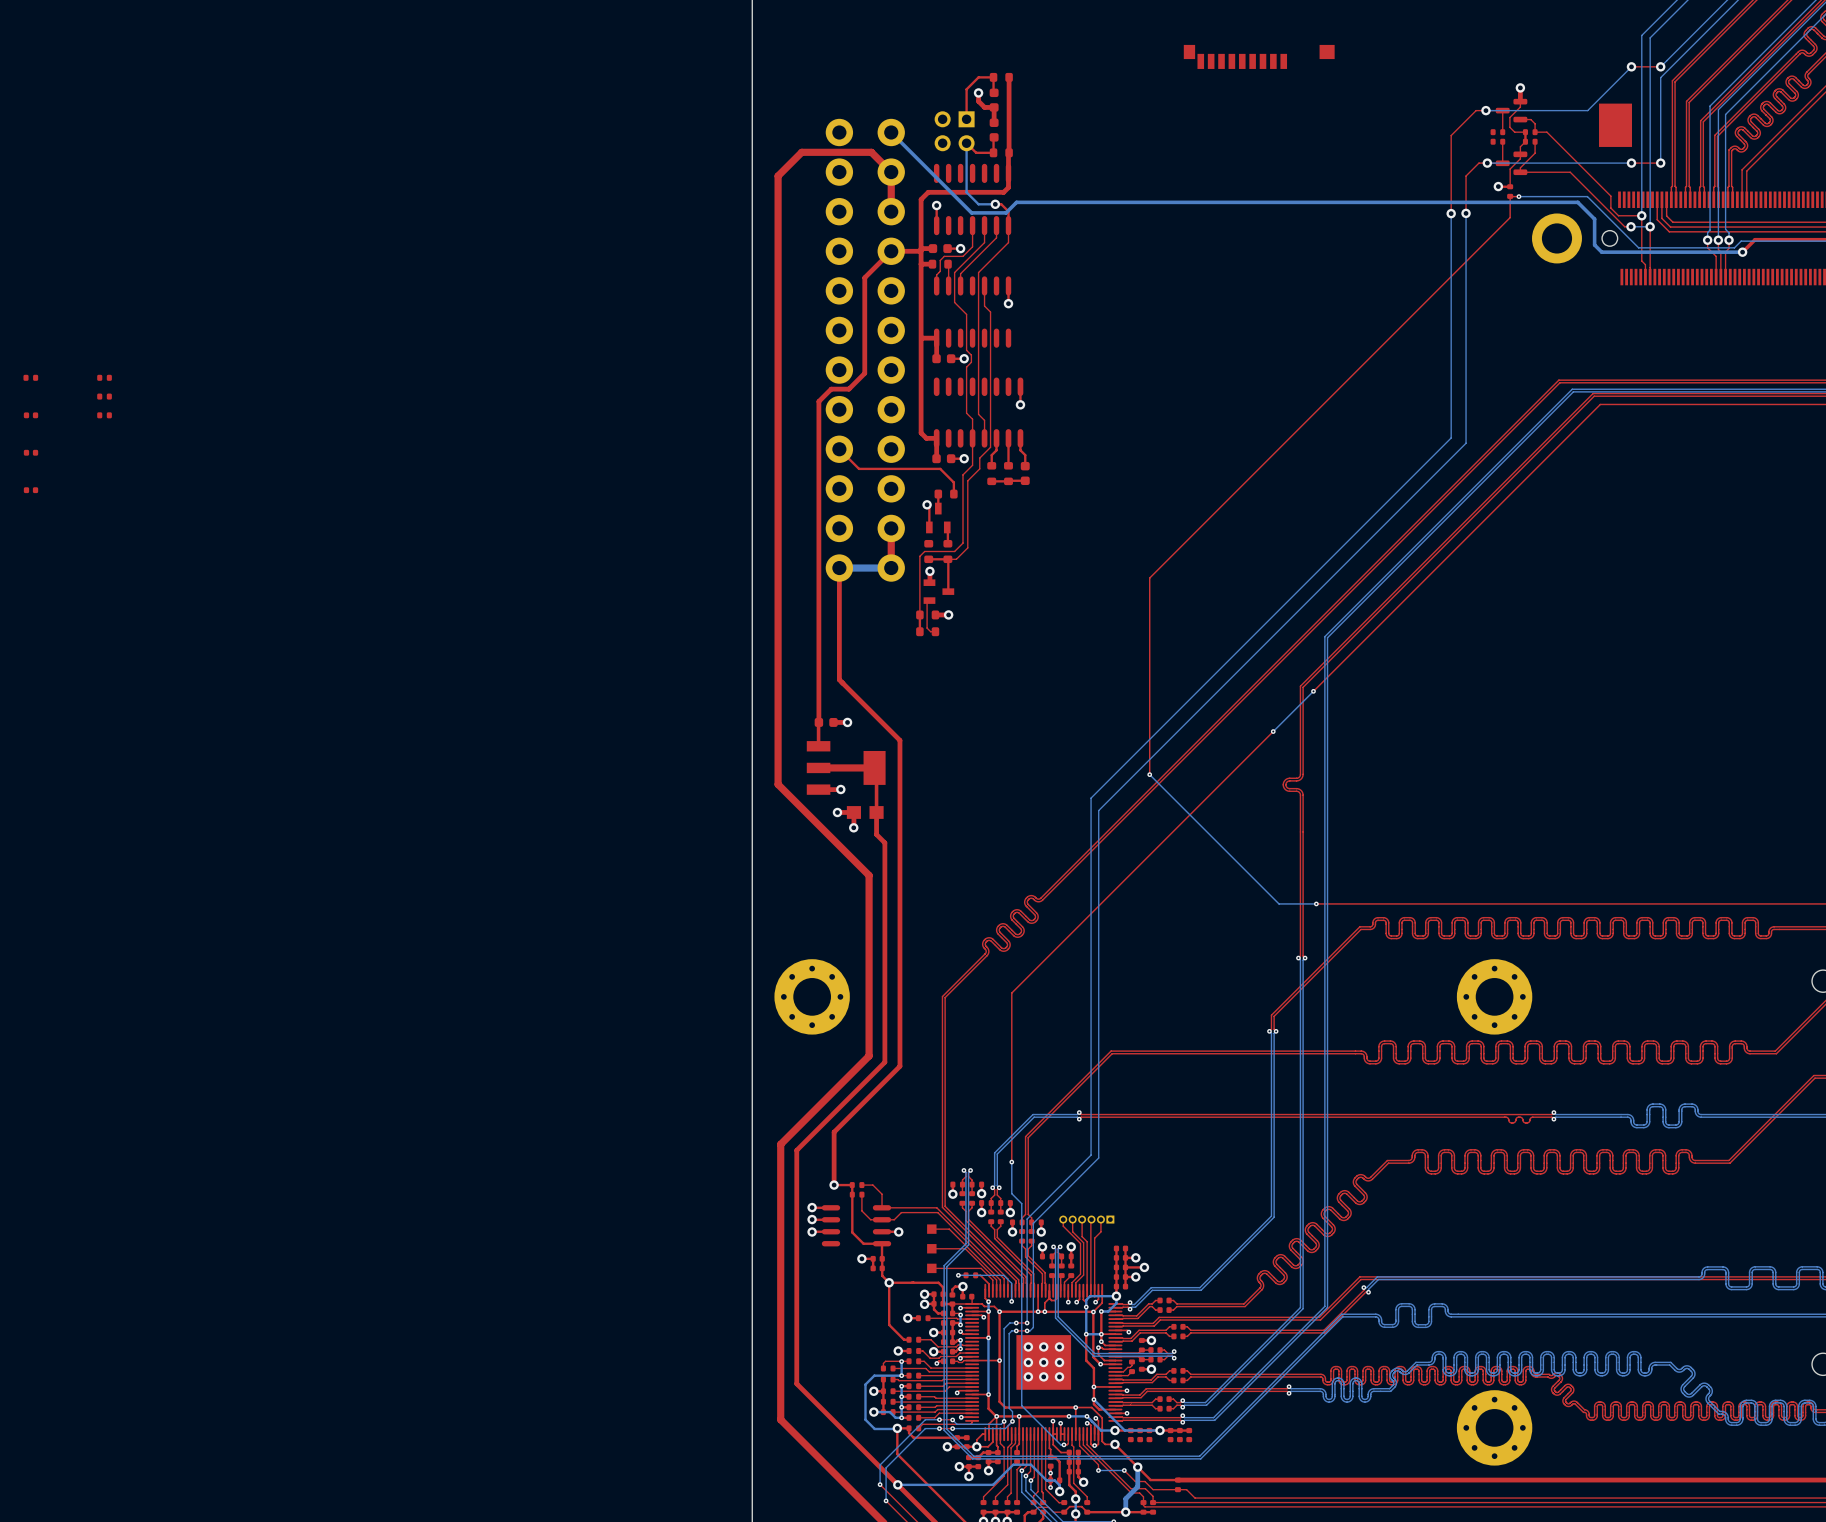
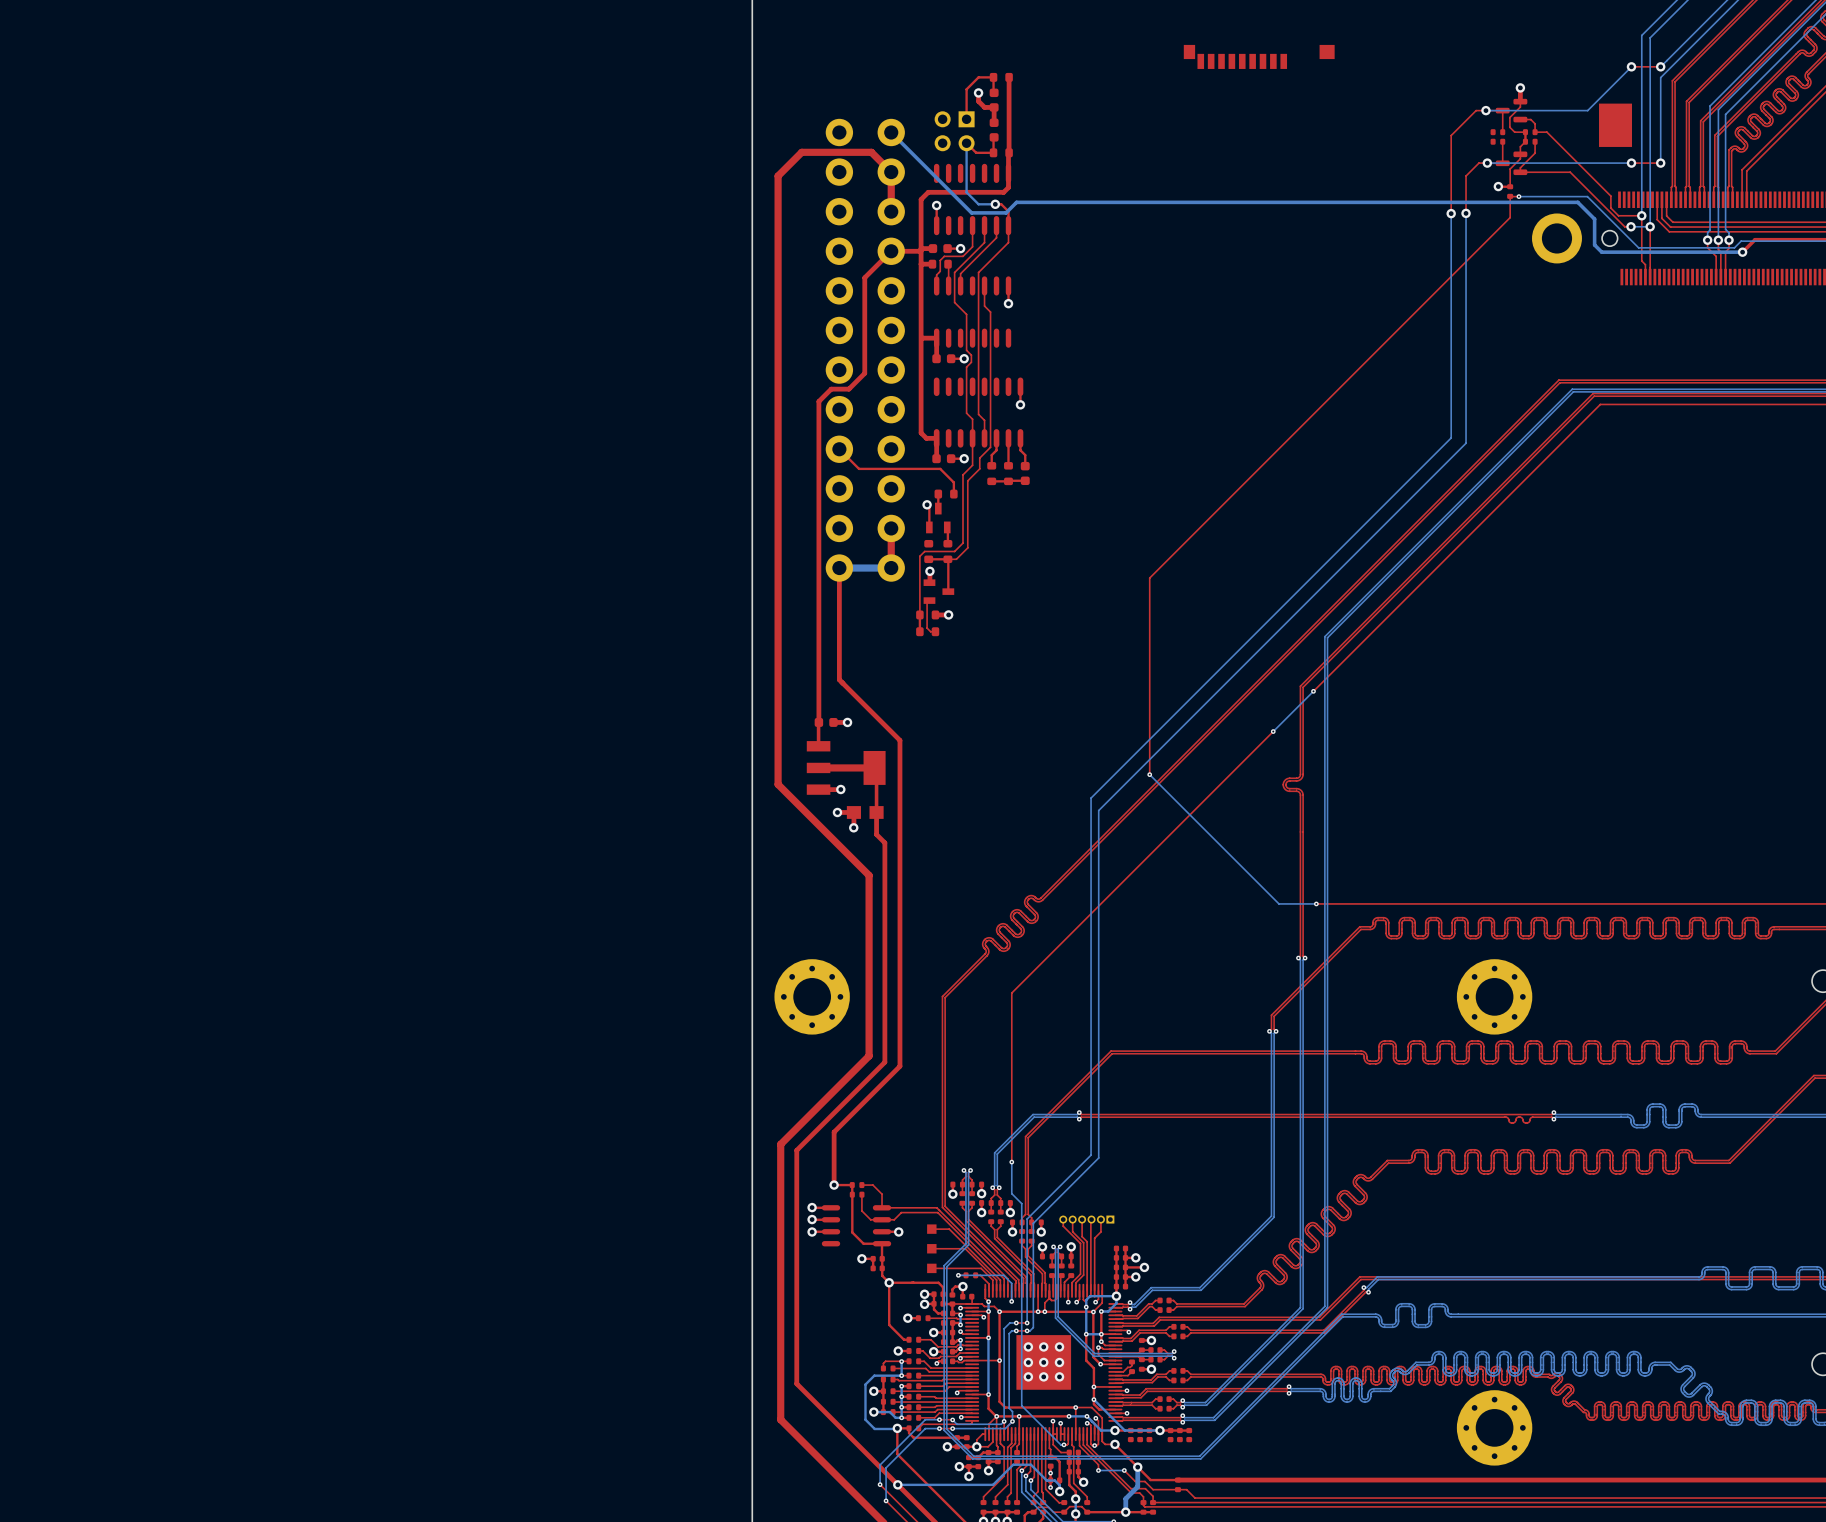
part: (30, 377) -> none
part: (104, 377) -> none
part: (104, 396) -> none
part: (31, 415) -> none
part: (104, 415) -> none
part: (31, 452) -> none
part: (31, 490) -> none

